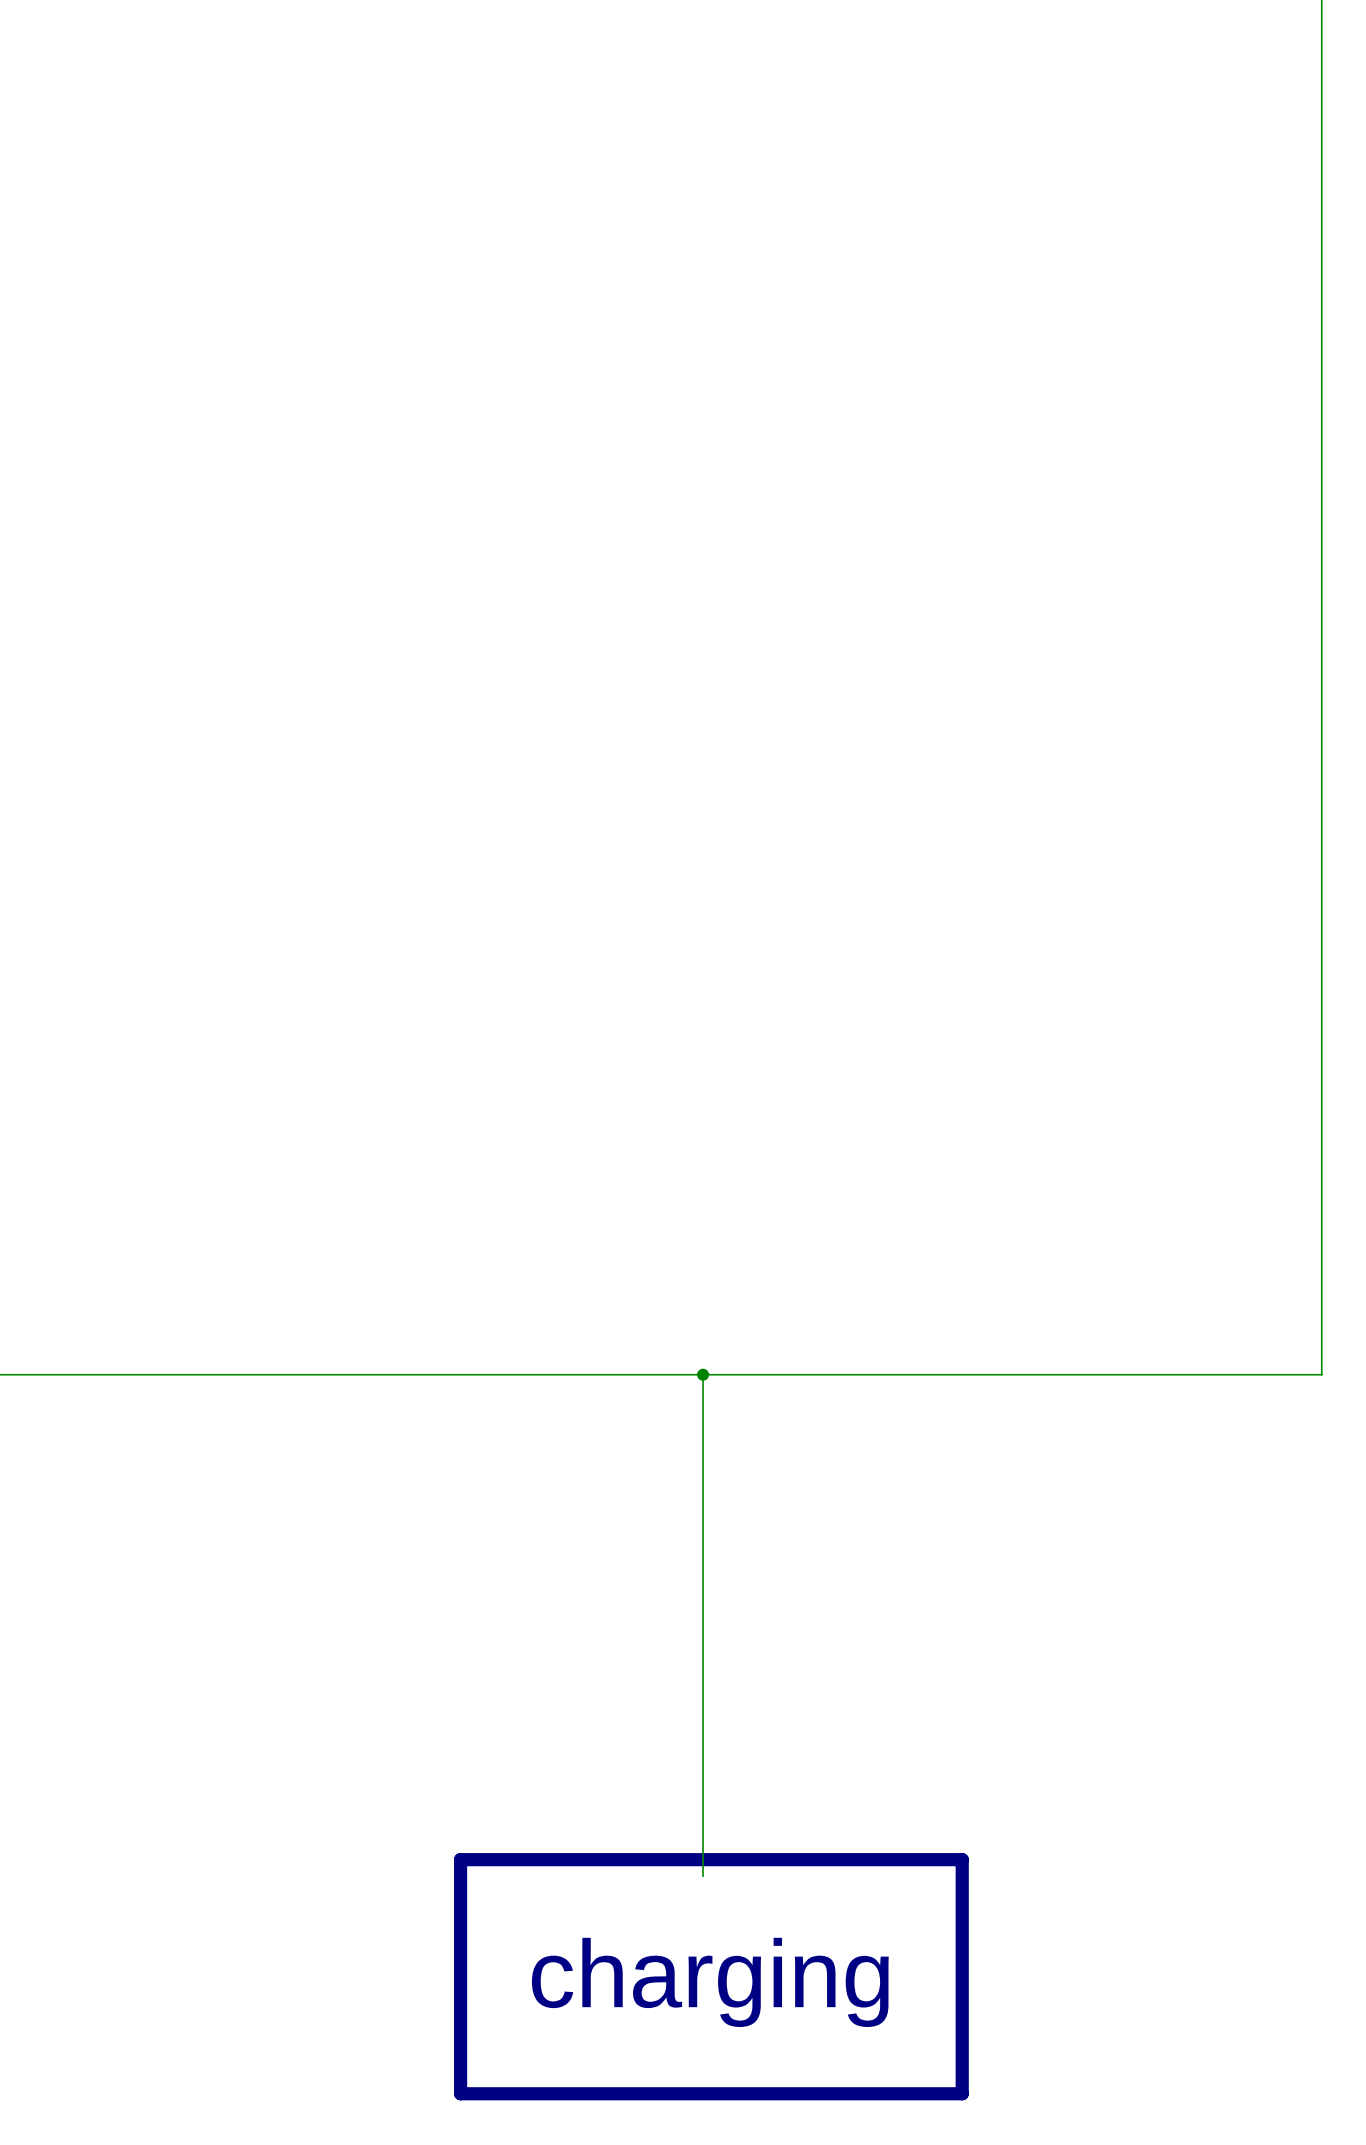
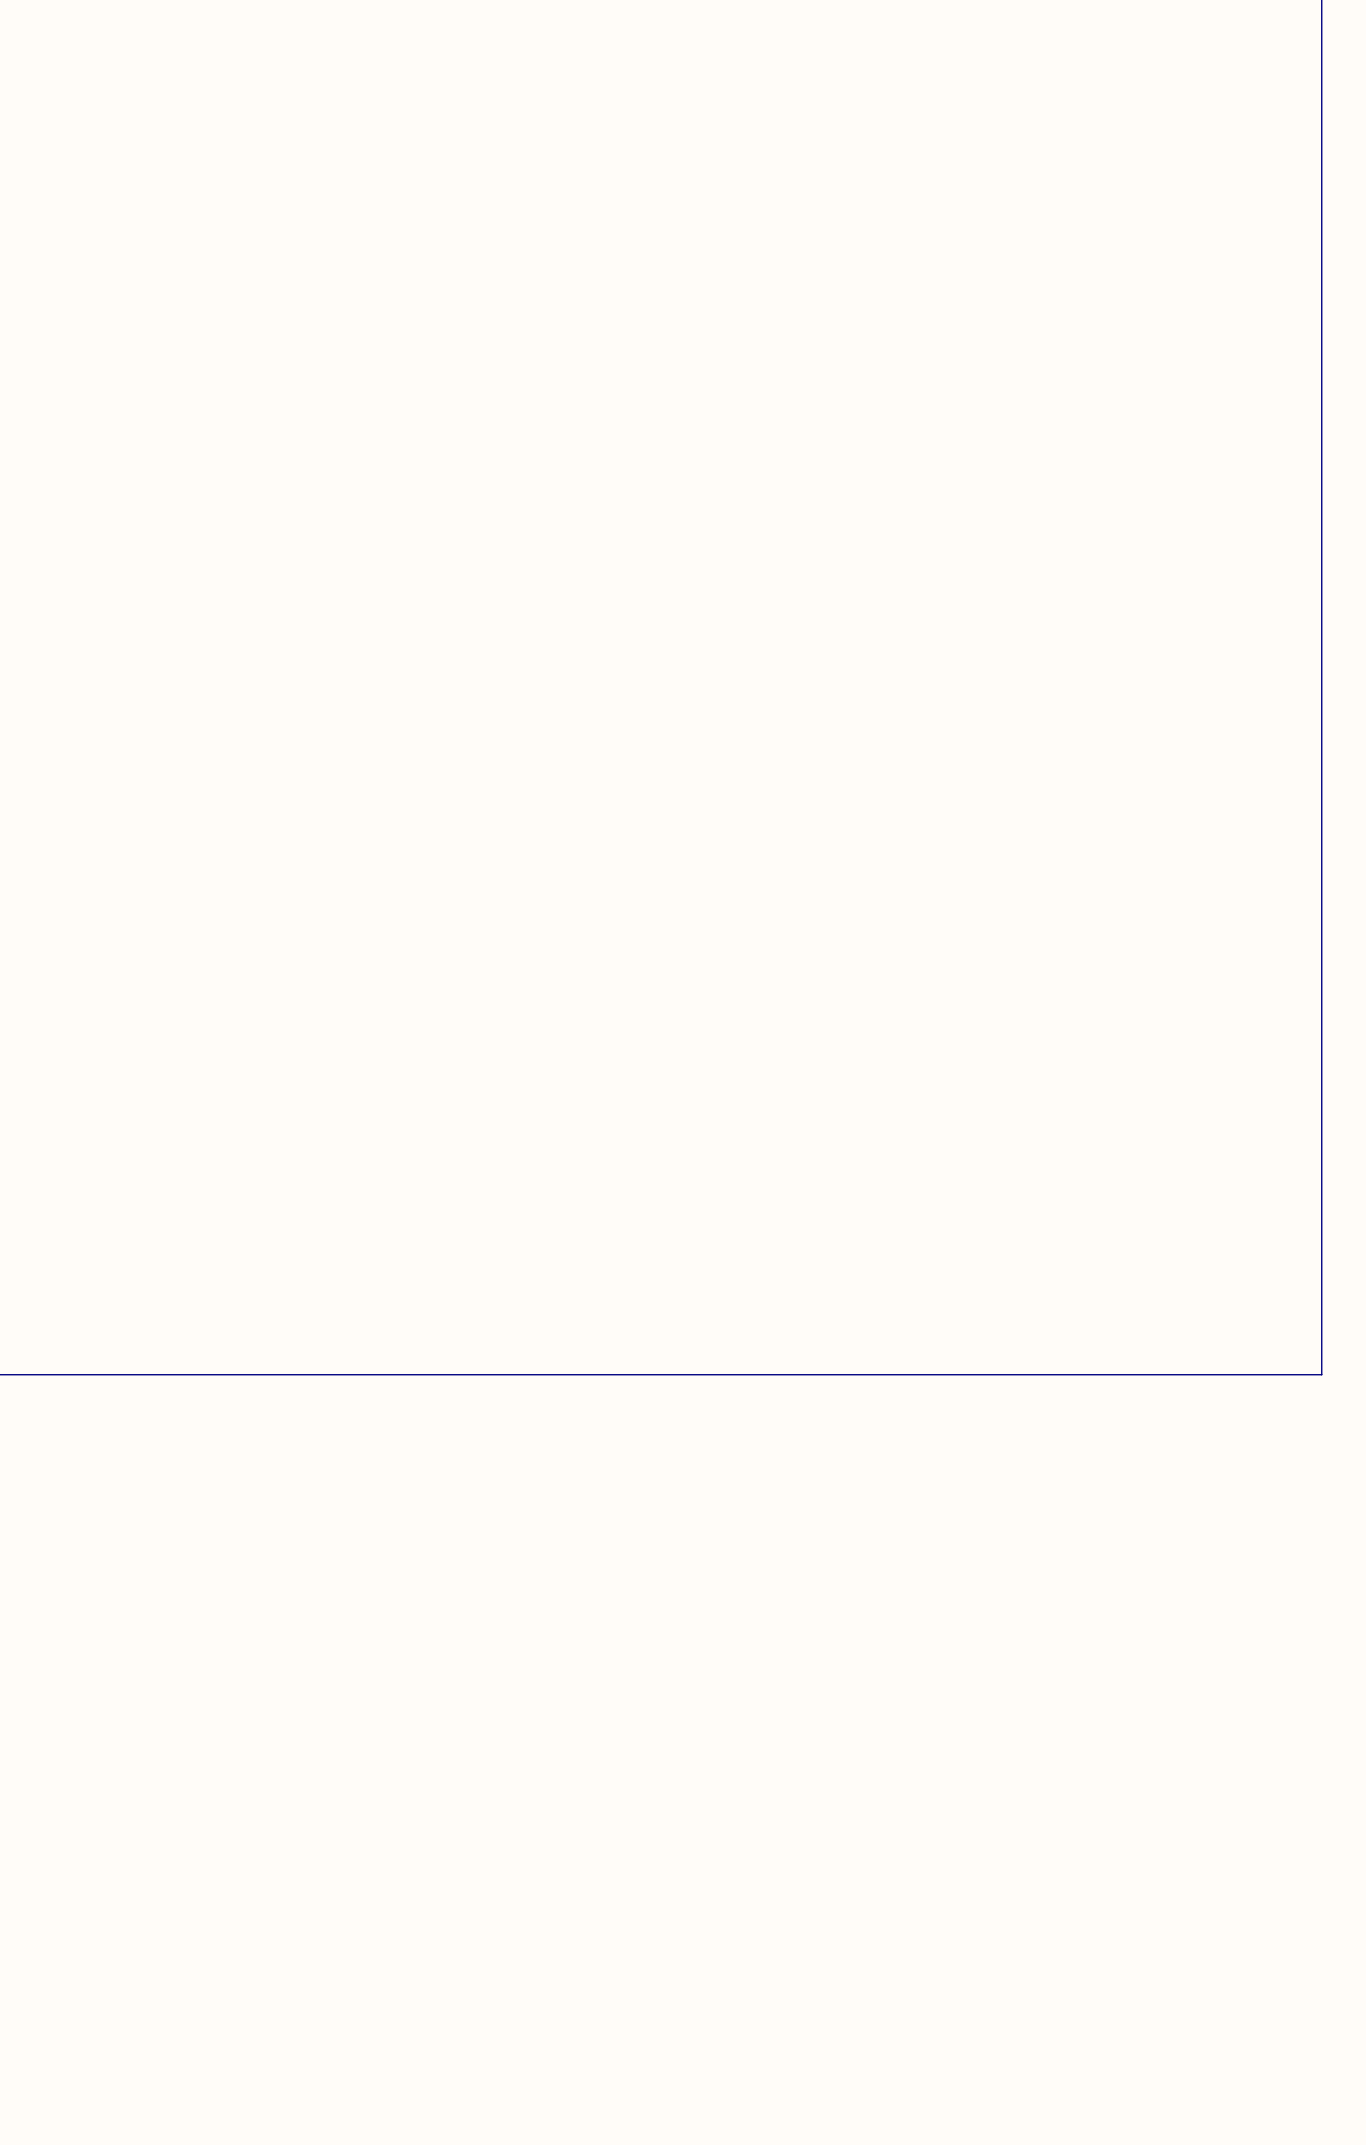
wire: (703, 1374) (703, 1876) -> none
junction: (703, 1374) -> none
line: (460, 1859) (962, 1859) (962, 2093) (460, 2093) (460, 1859) -> none
text: charging (710, 1982) -> none

